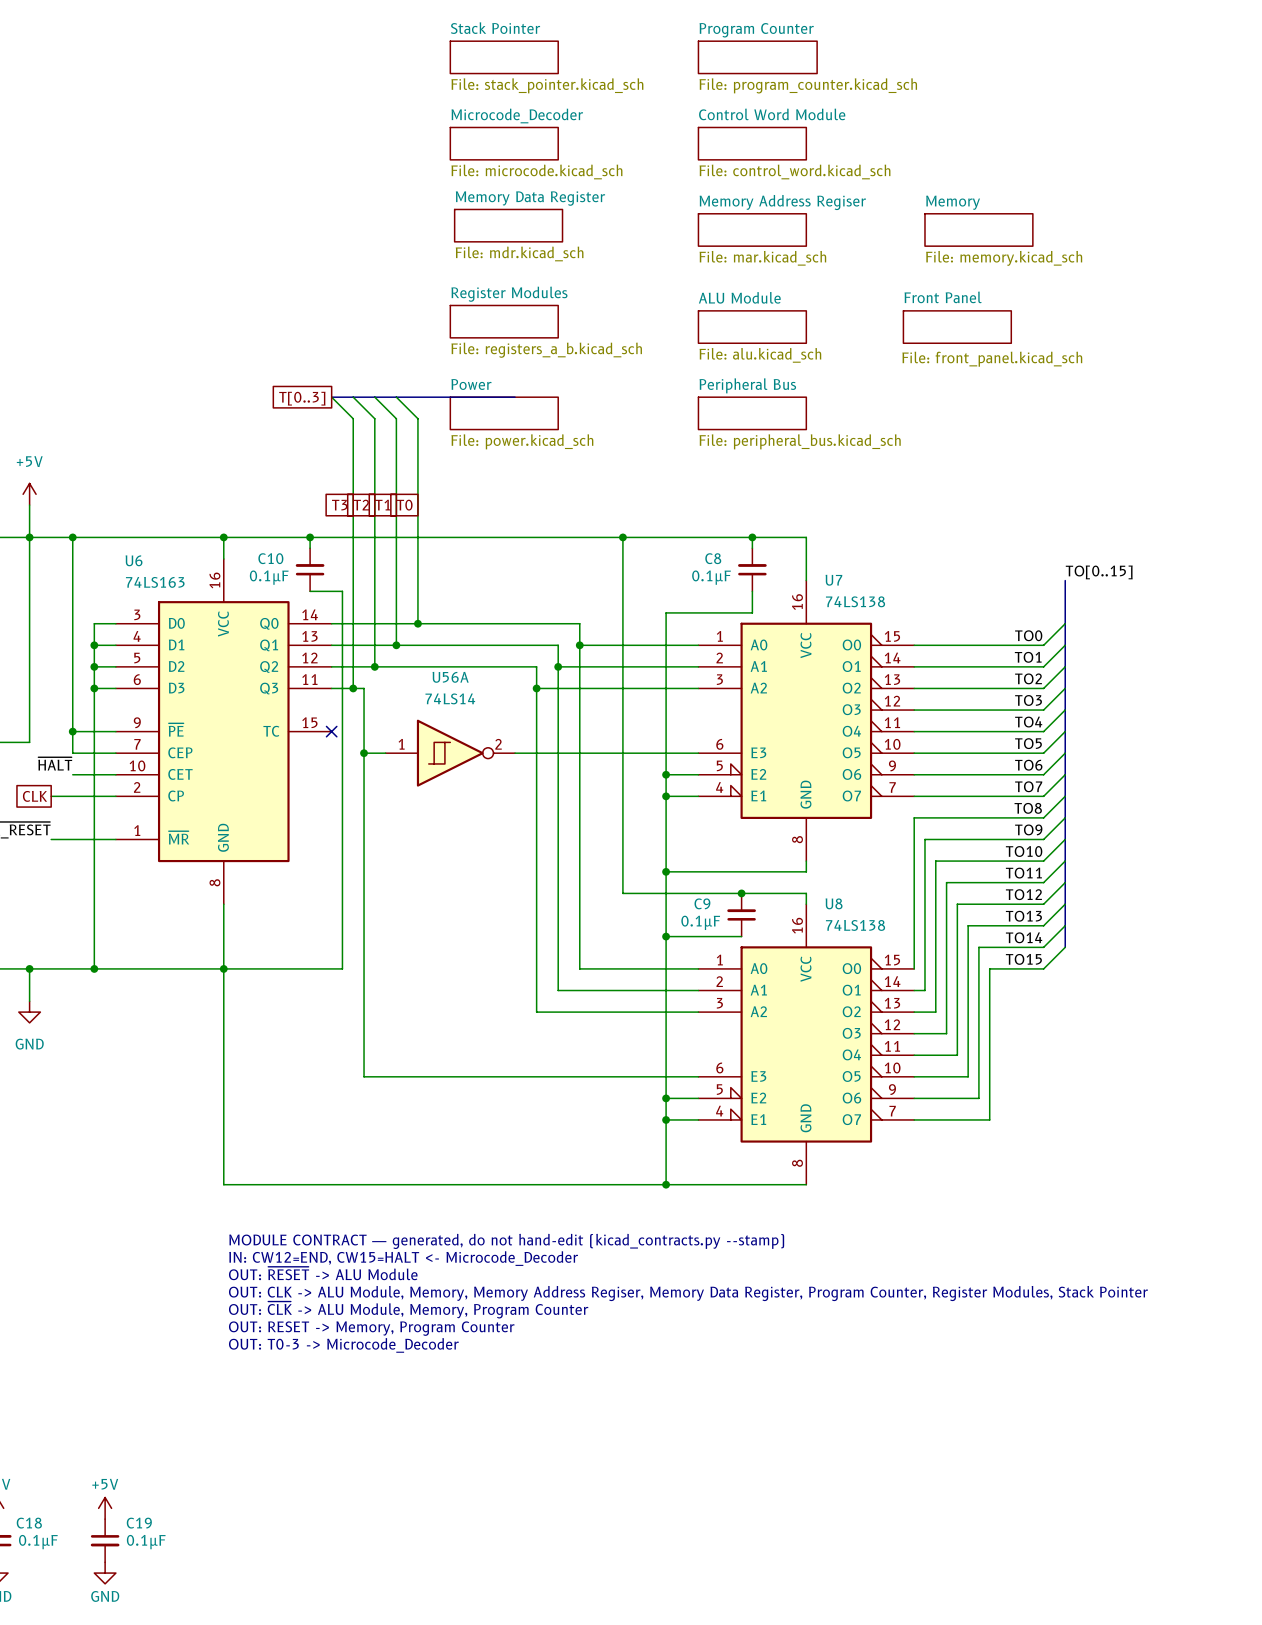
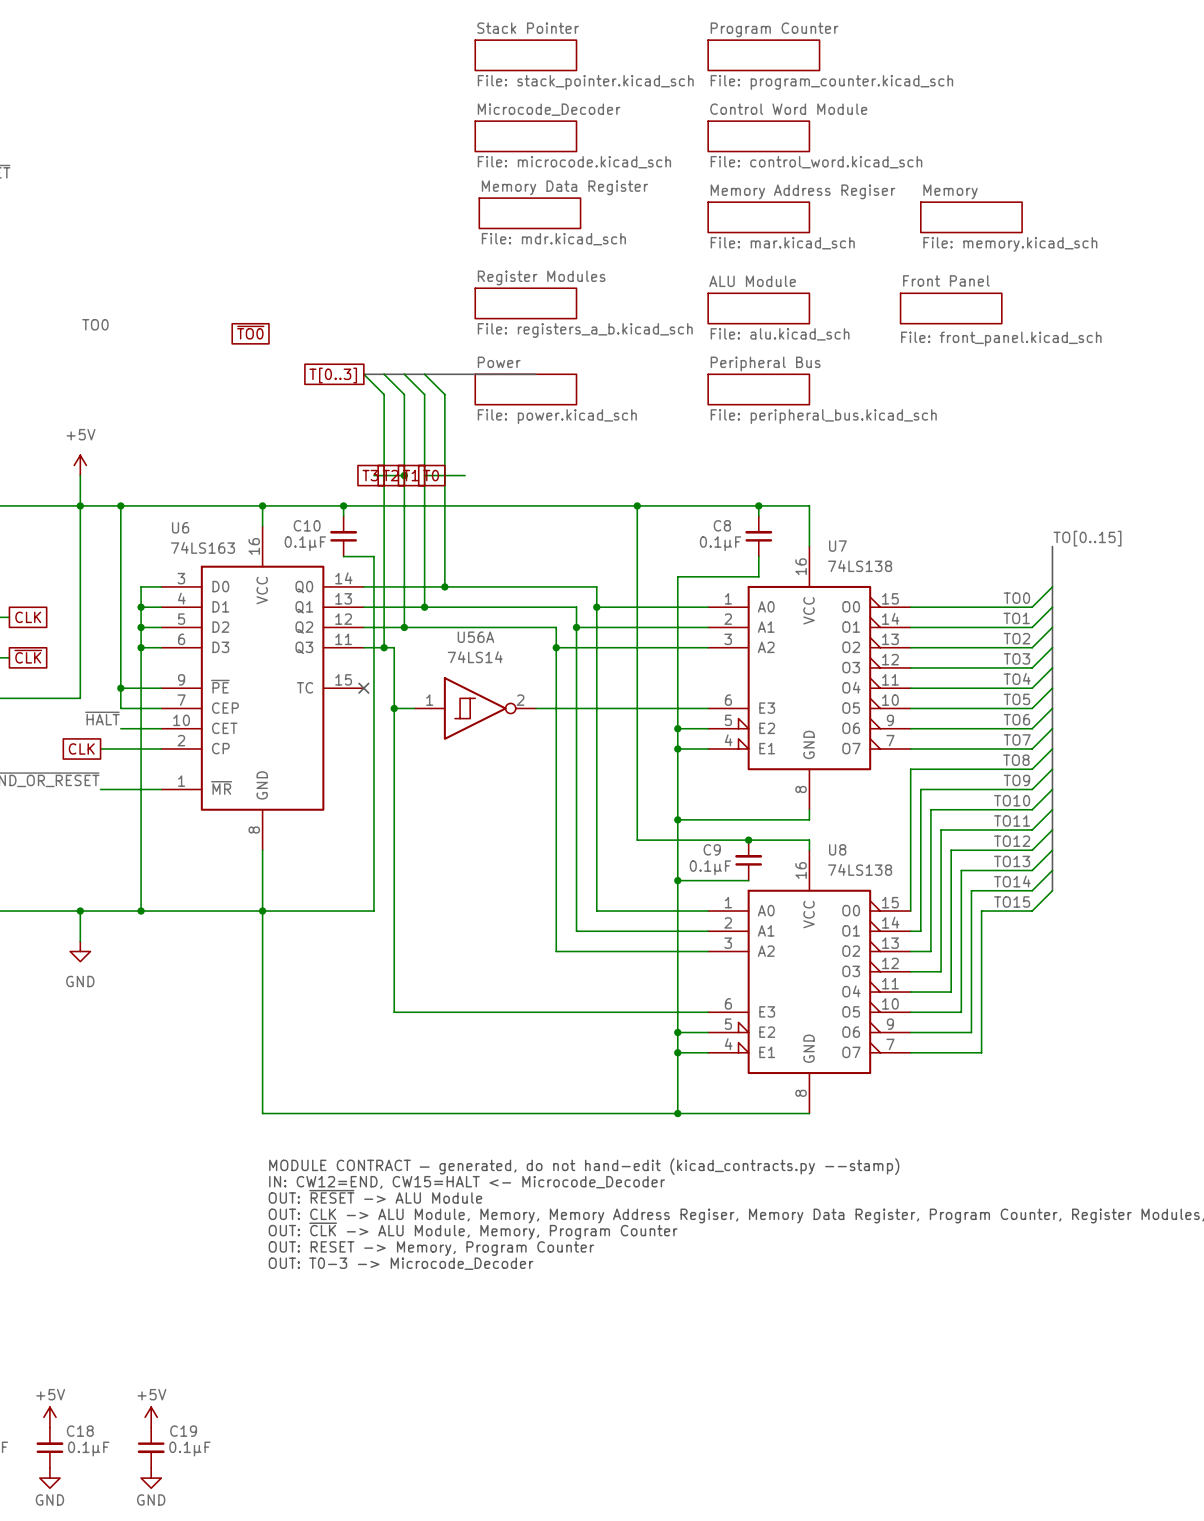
label: none -> TO0 (95, 324)
global label: none -> ~{TO0} (250, 332)
wire: none -> (373, 475) (404, 475)
junction: none -> (404, 475)
wire: none -> (424, 475) (465, 475)

